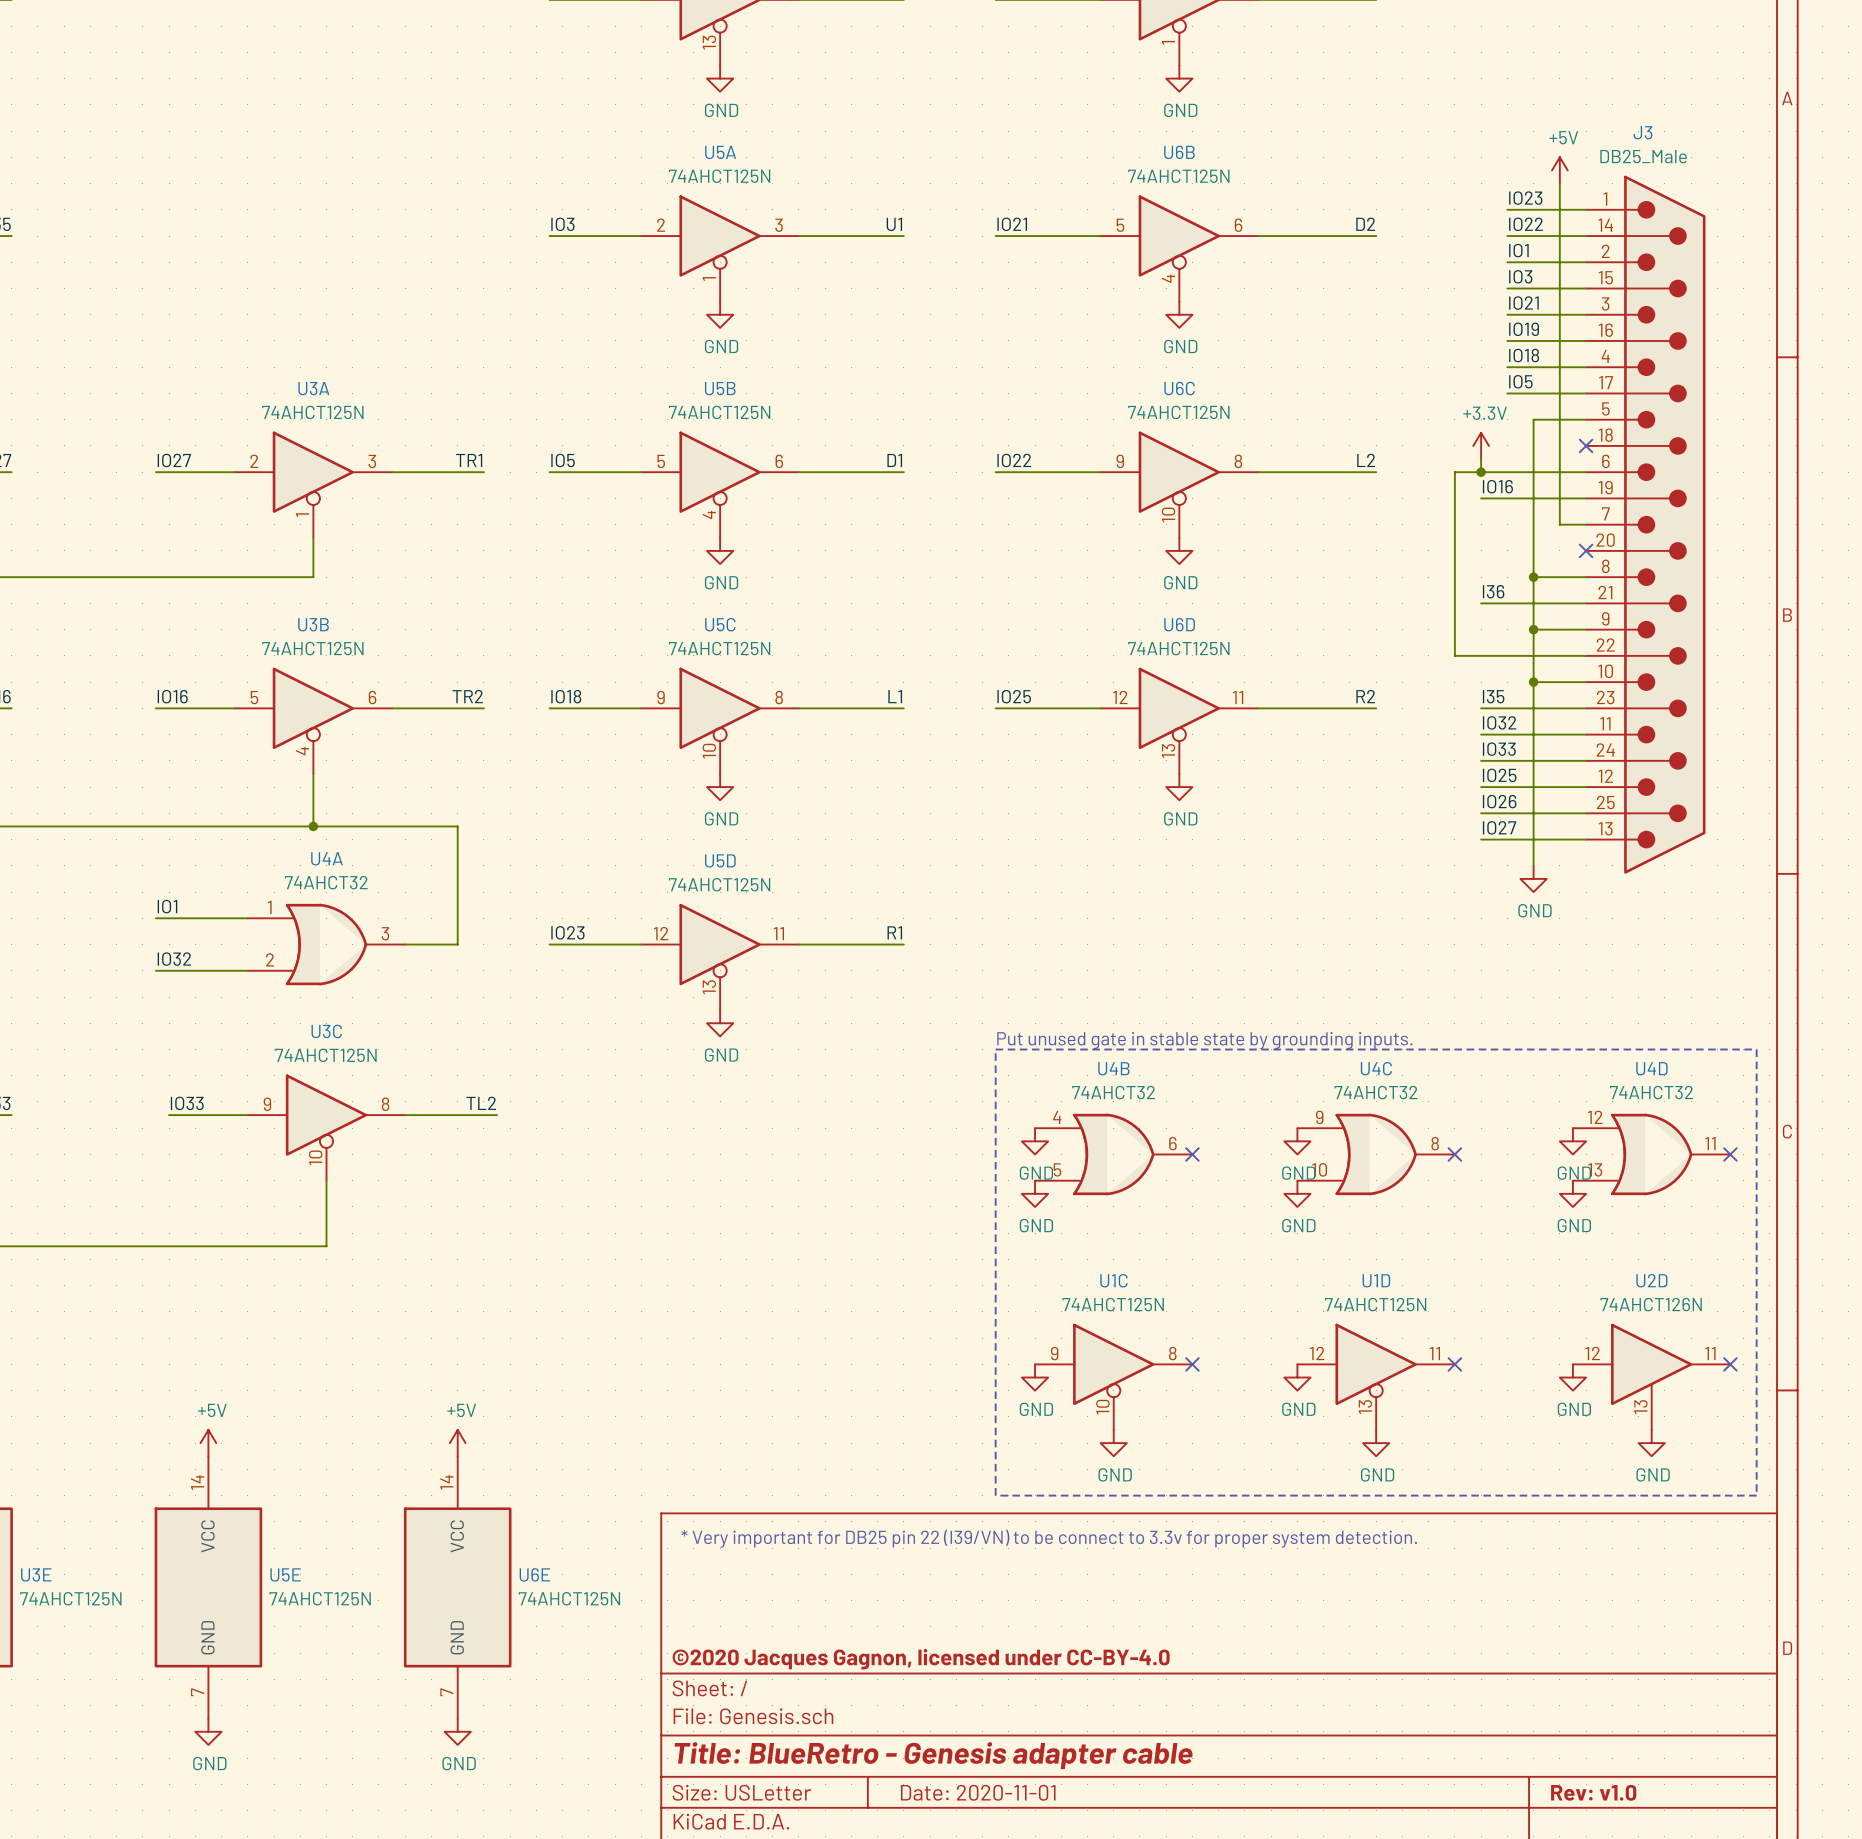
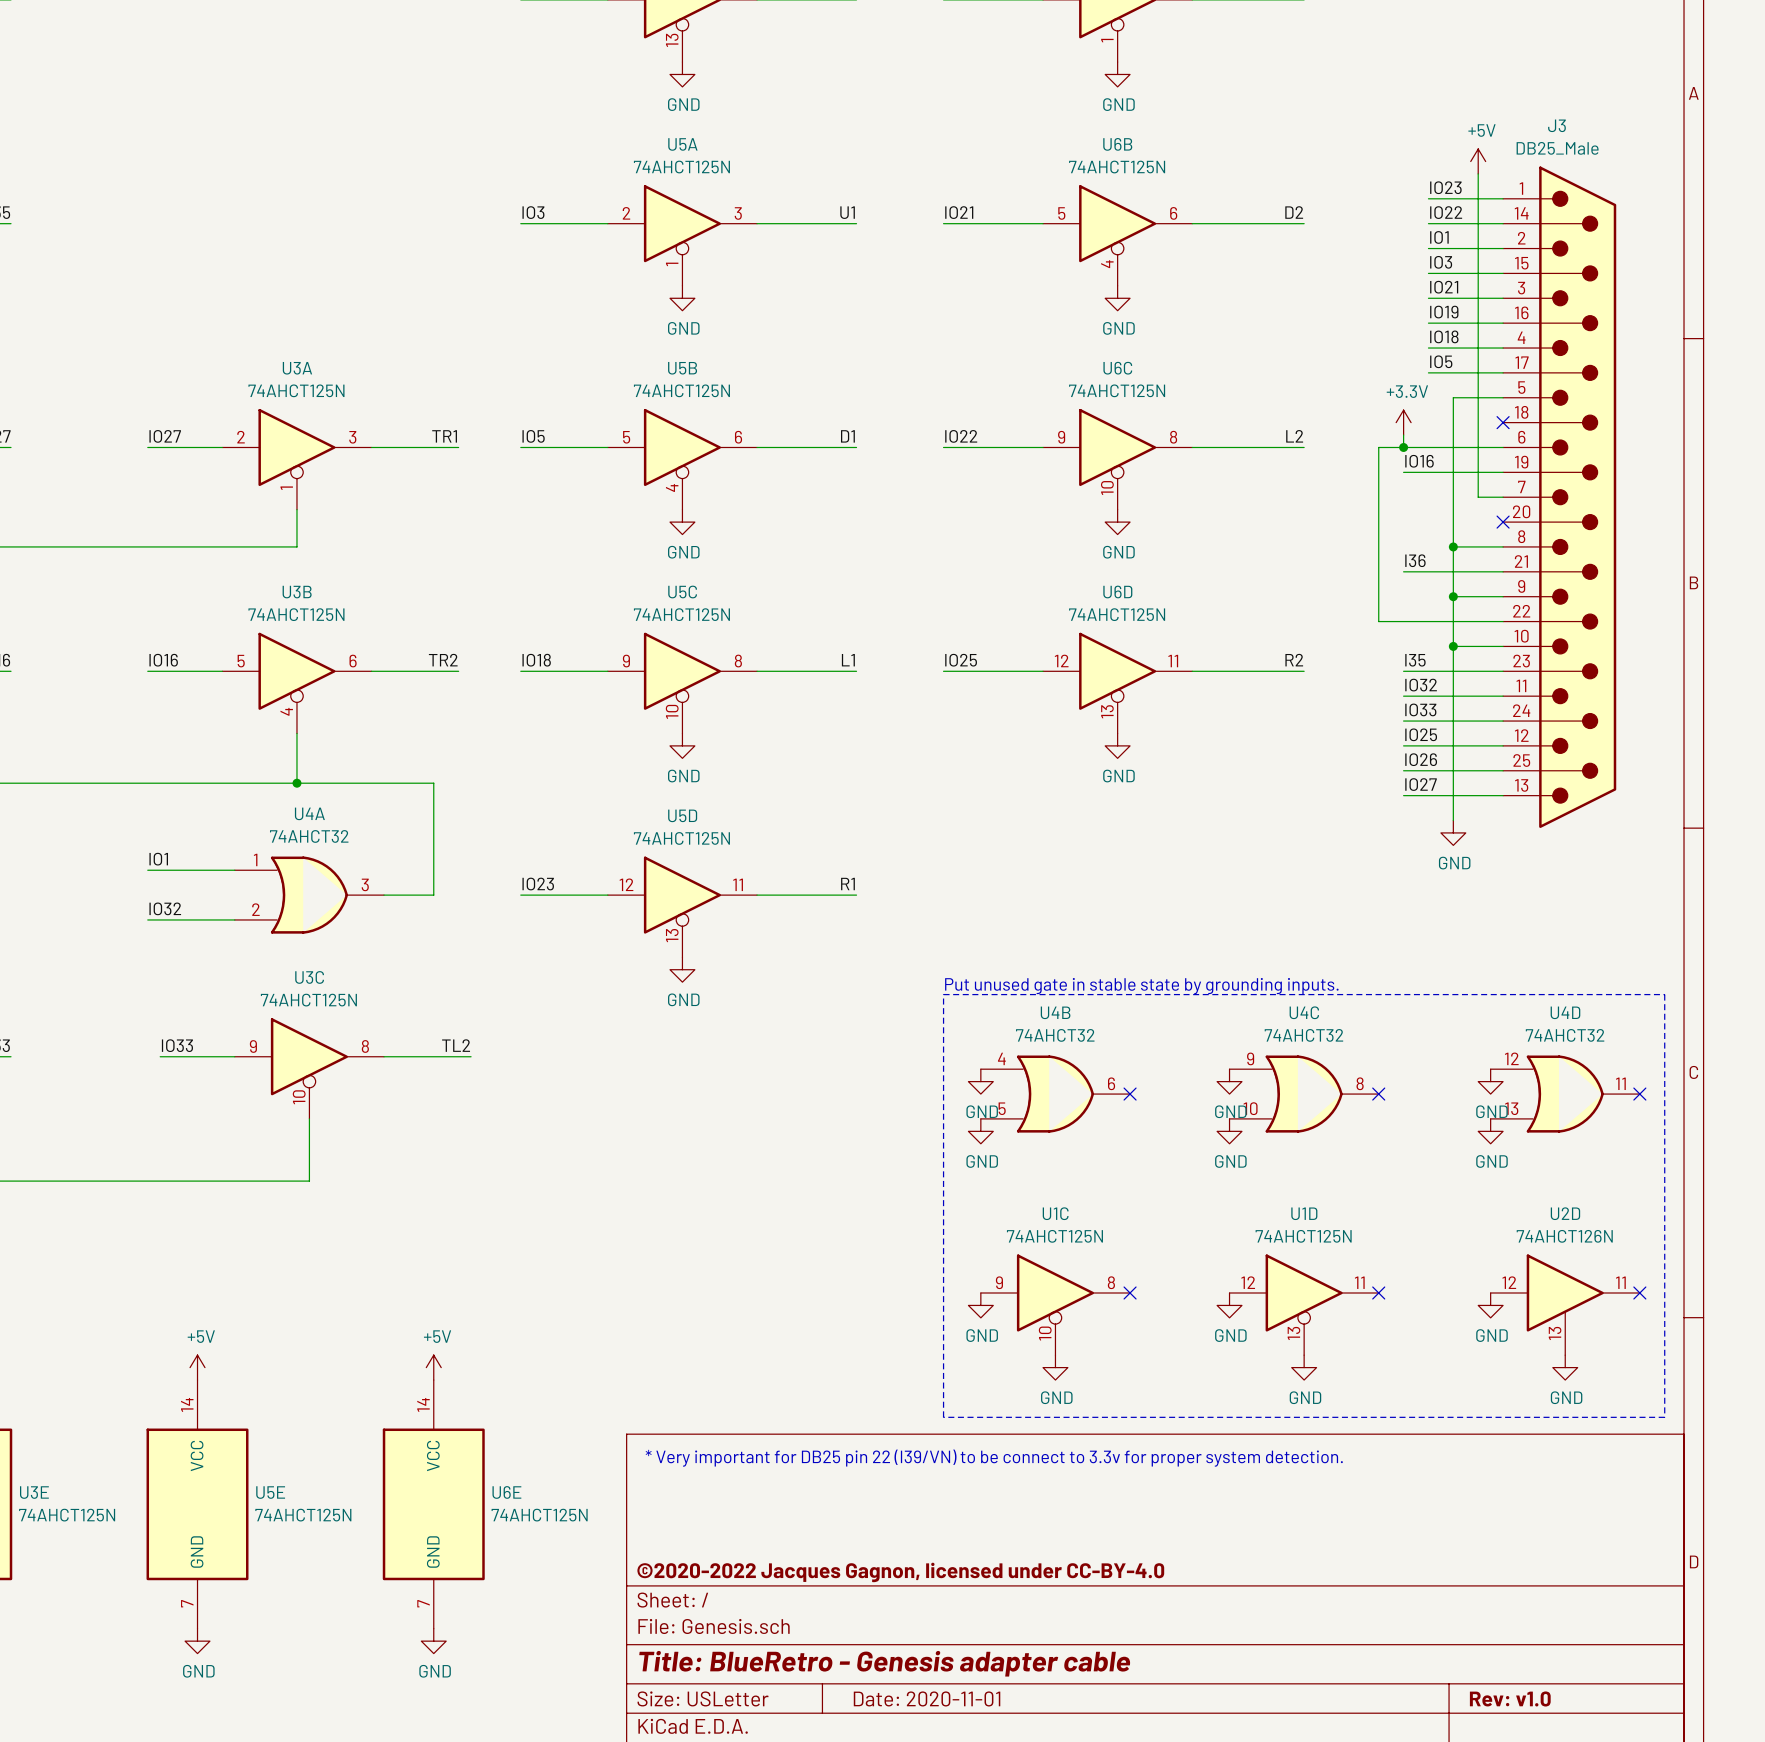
title block: ©2020 Jacques Gagnon, licensed under CC-BY-4.0 (921, 1659) -> ©2020-2022 Jacques Gagnon, licensed under CC-BY-4.0 (900, 1572)

